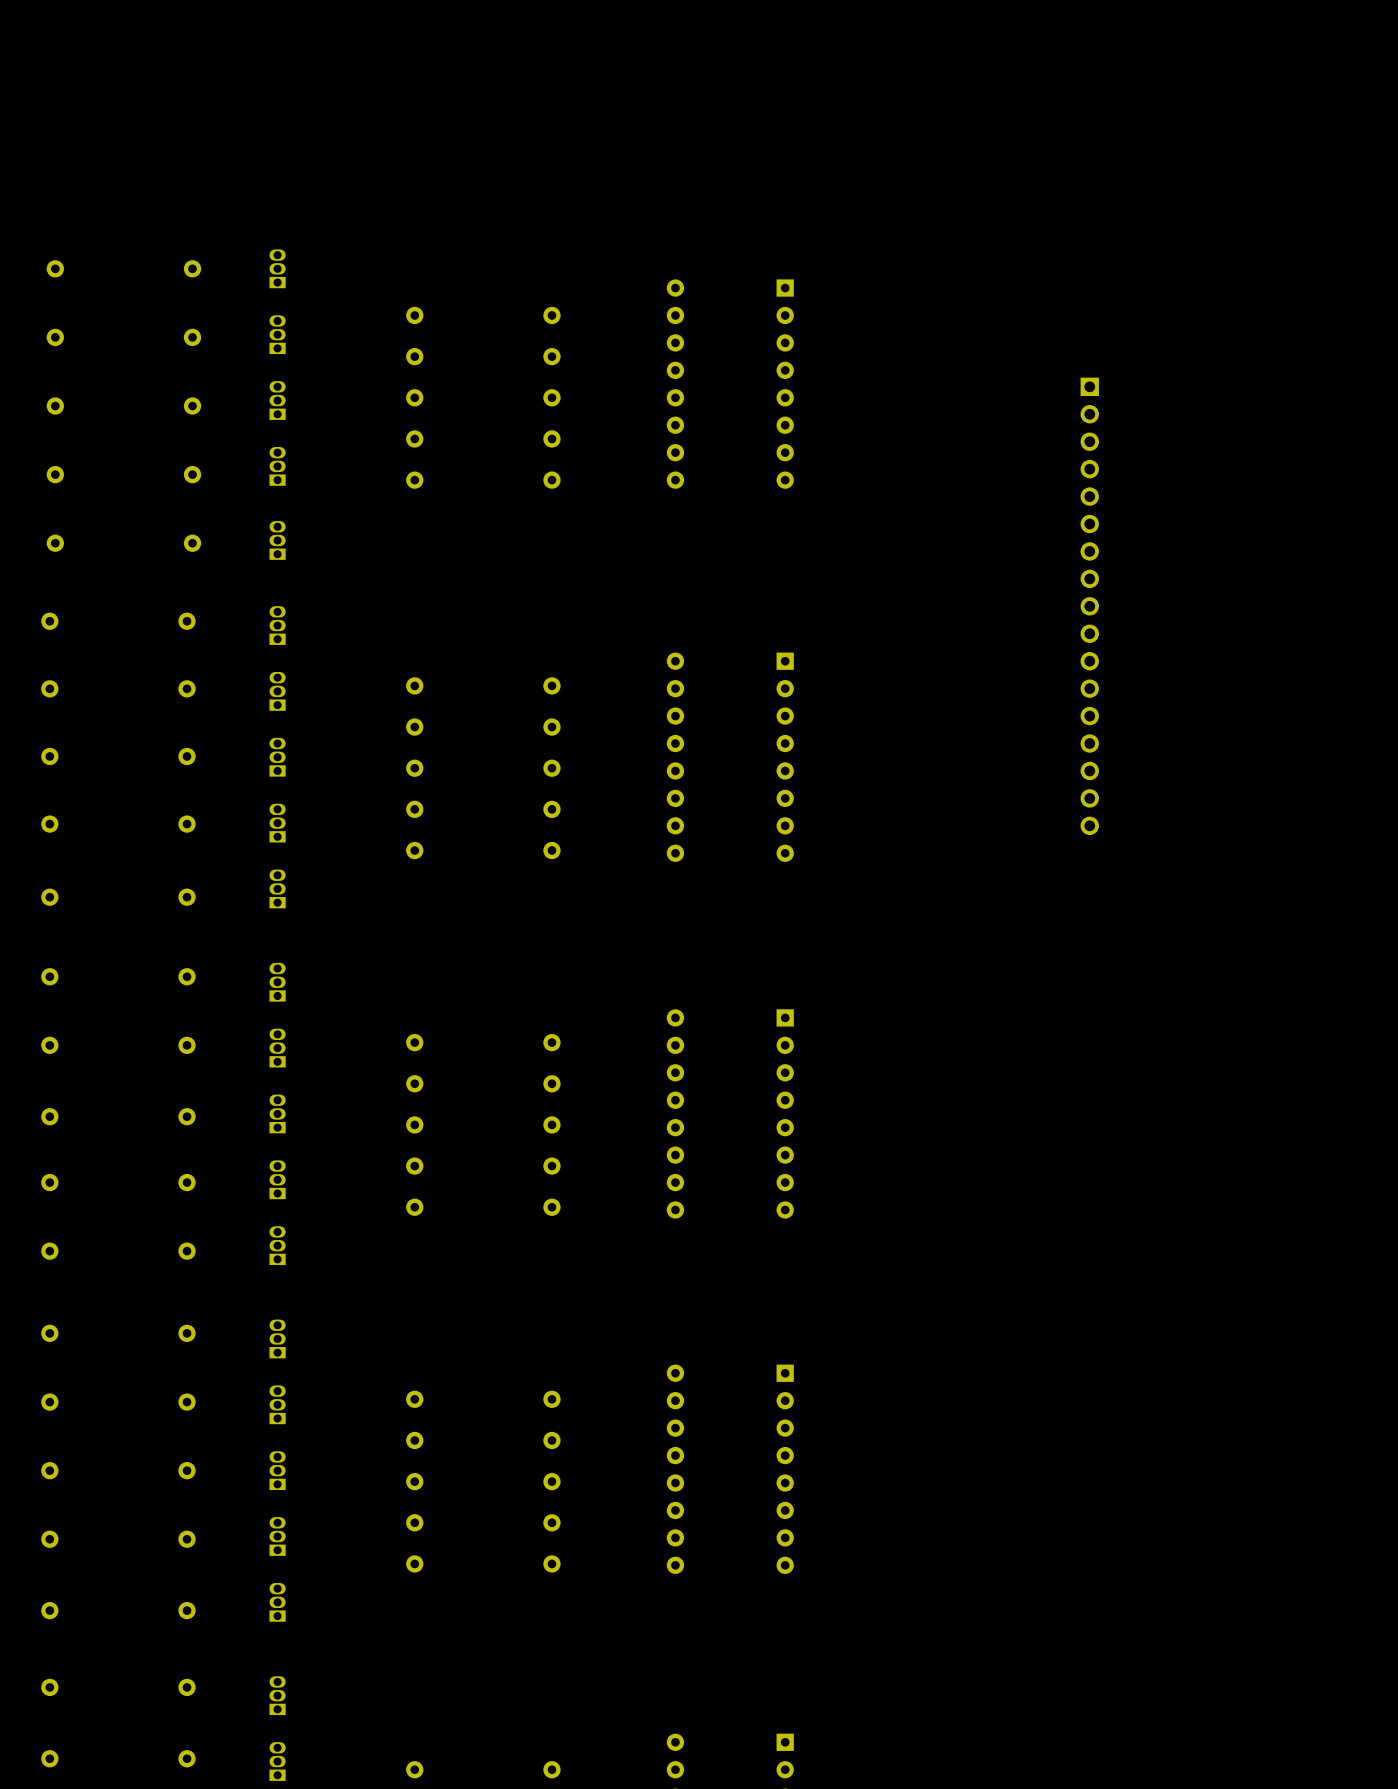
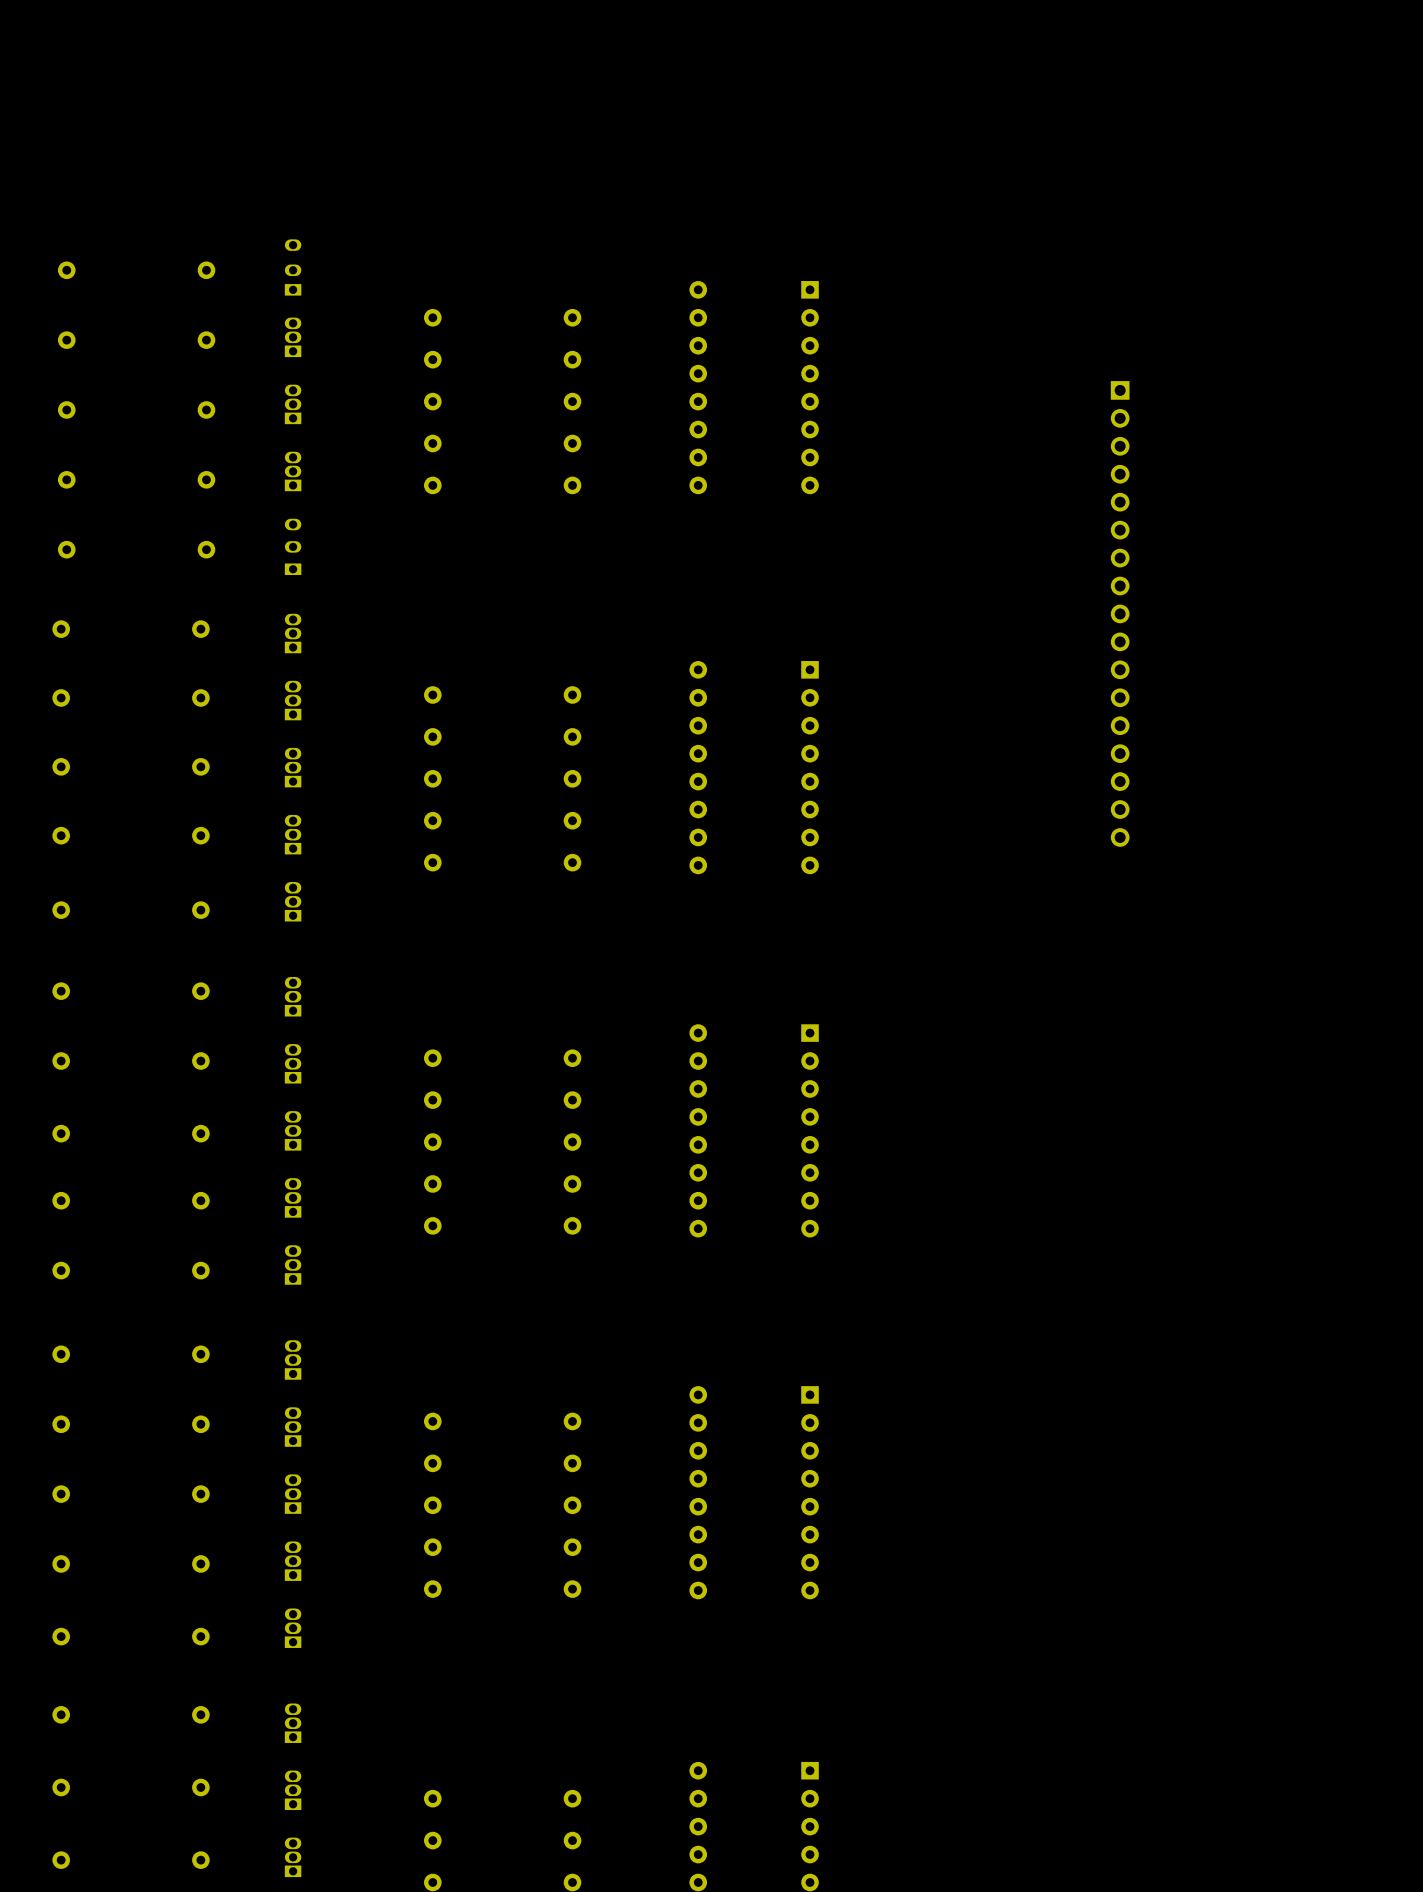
part footprint: [269, 249, 286, 289] -> [284, 239, 302, 296]
part footprint: [269, 521, 286, 560] -> [284, 518, 302, 576]

